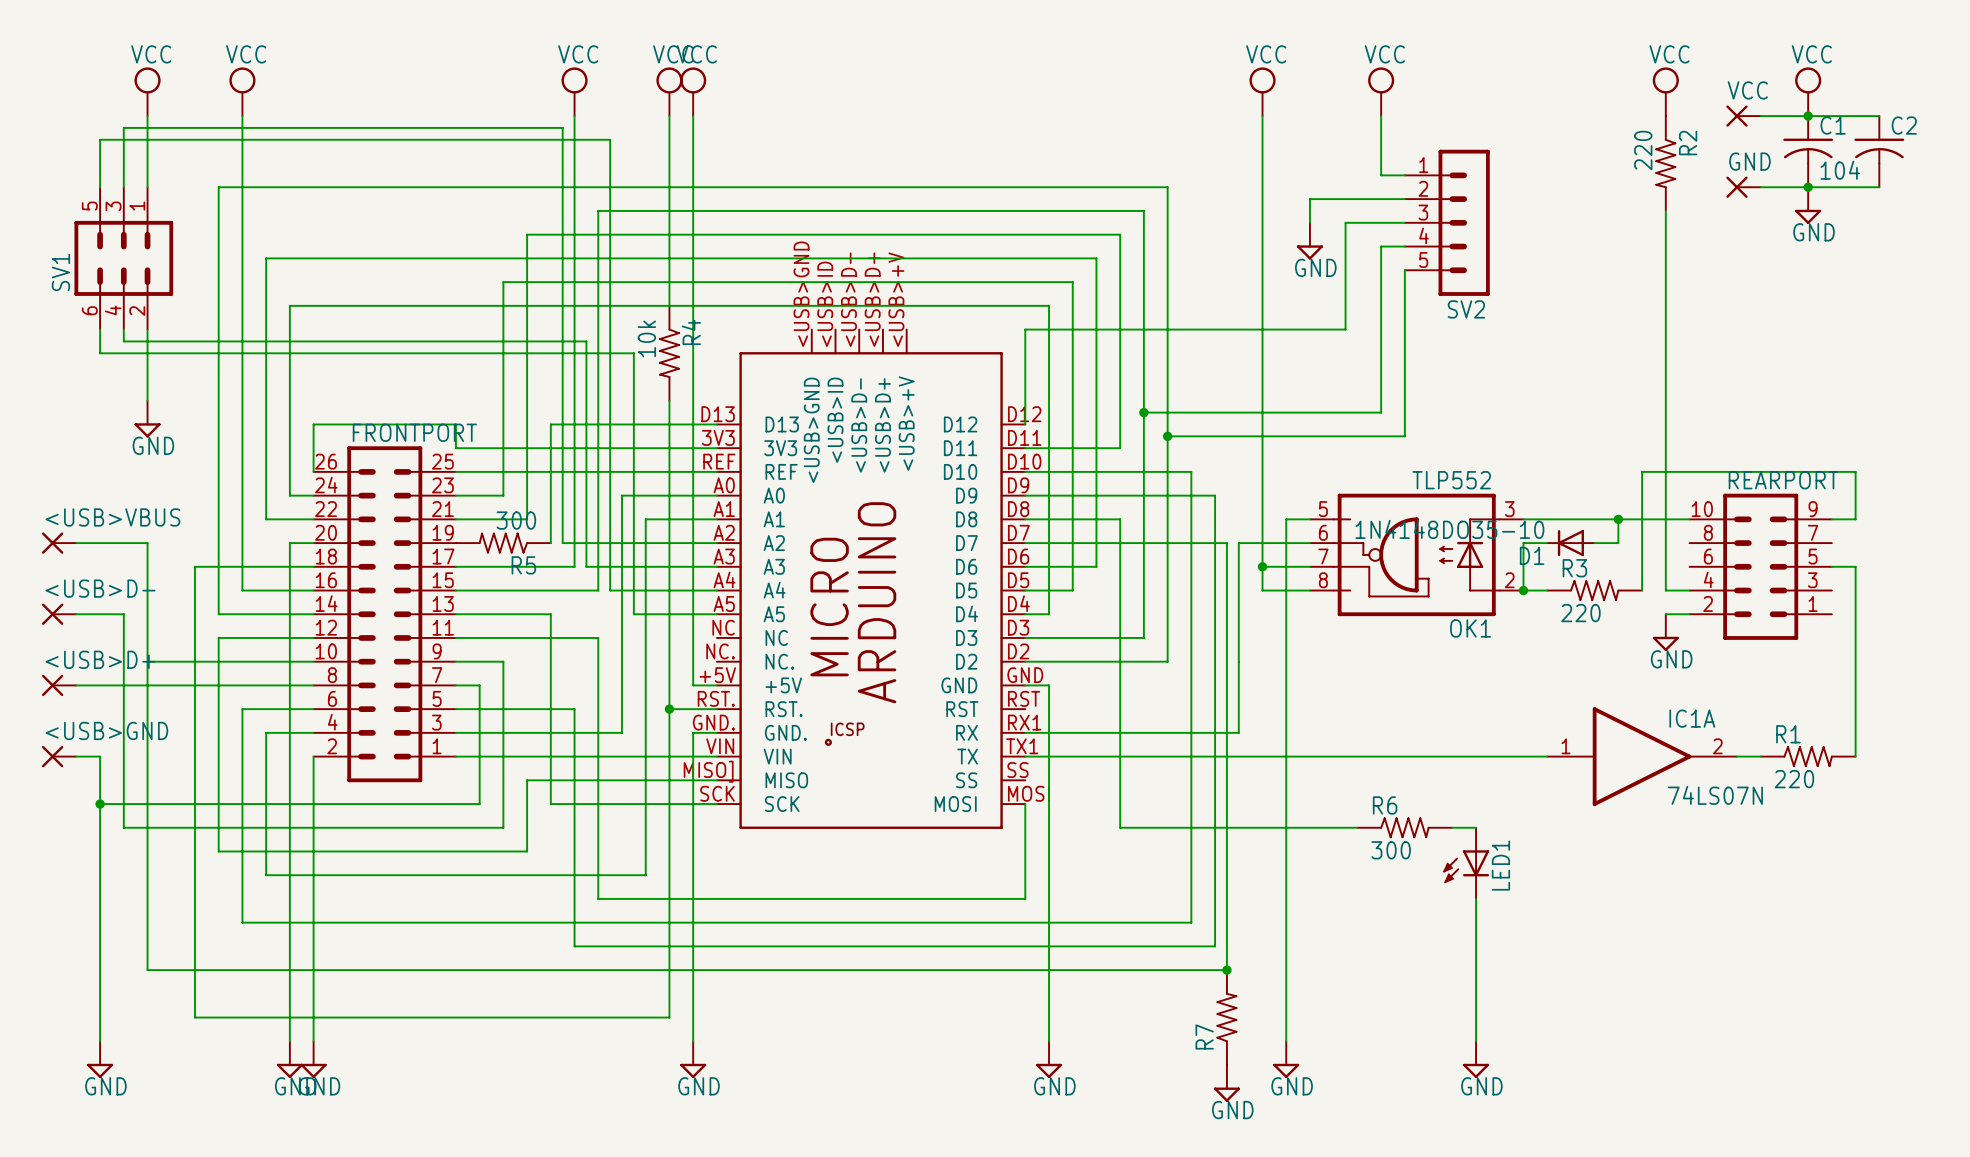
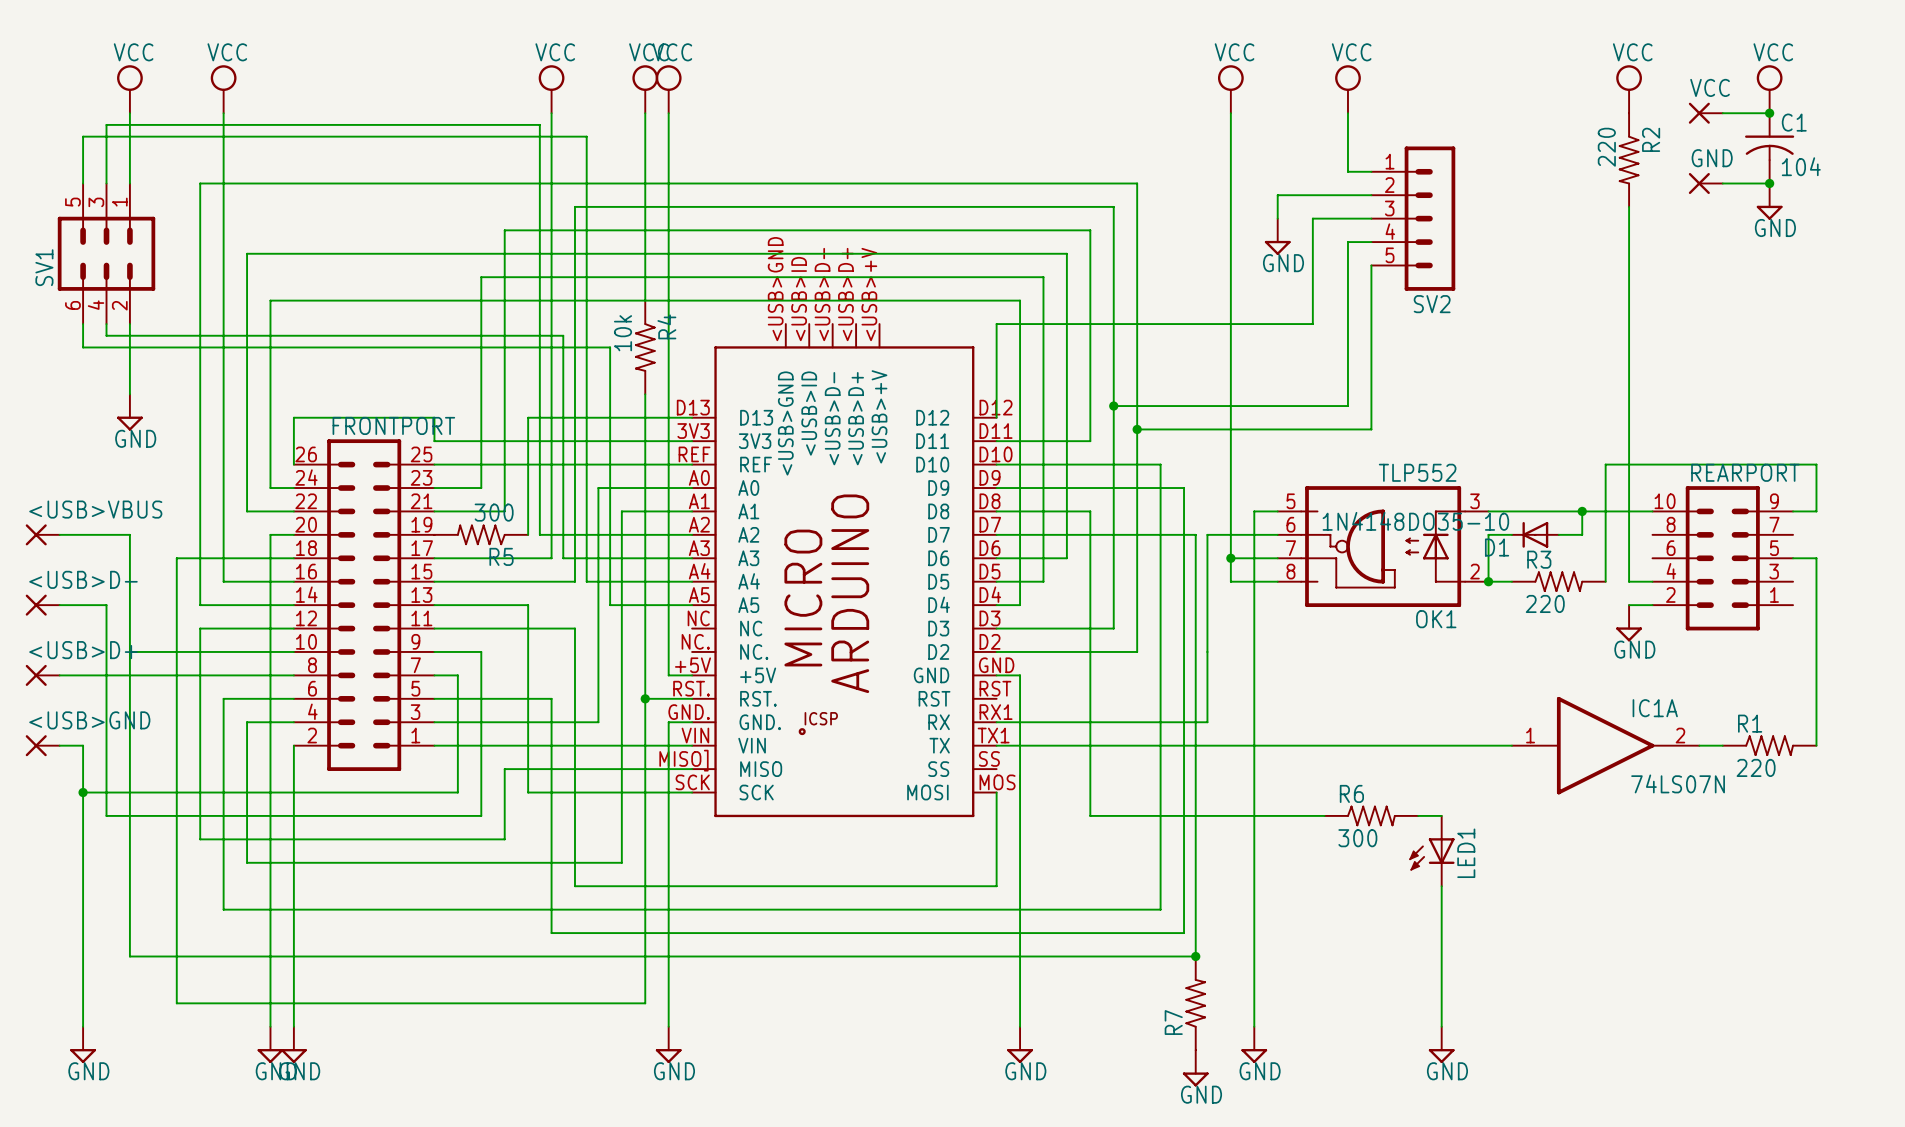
wire: (1808, 116) (1879, 116) -> none
C2: (1879, 151) -> none
wire: (1808, 187) (1879, 187) -> none

